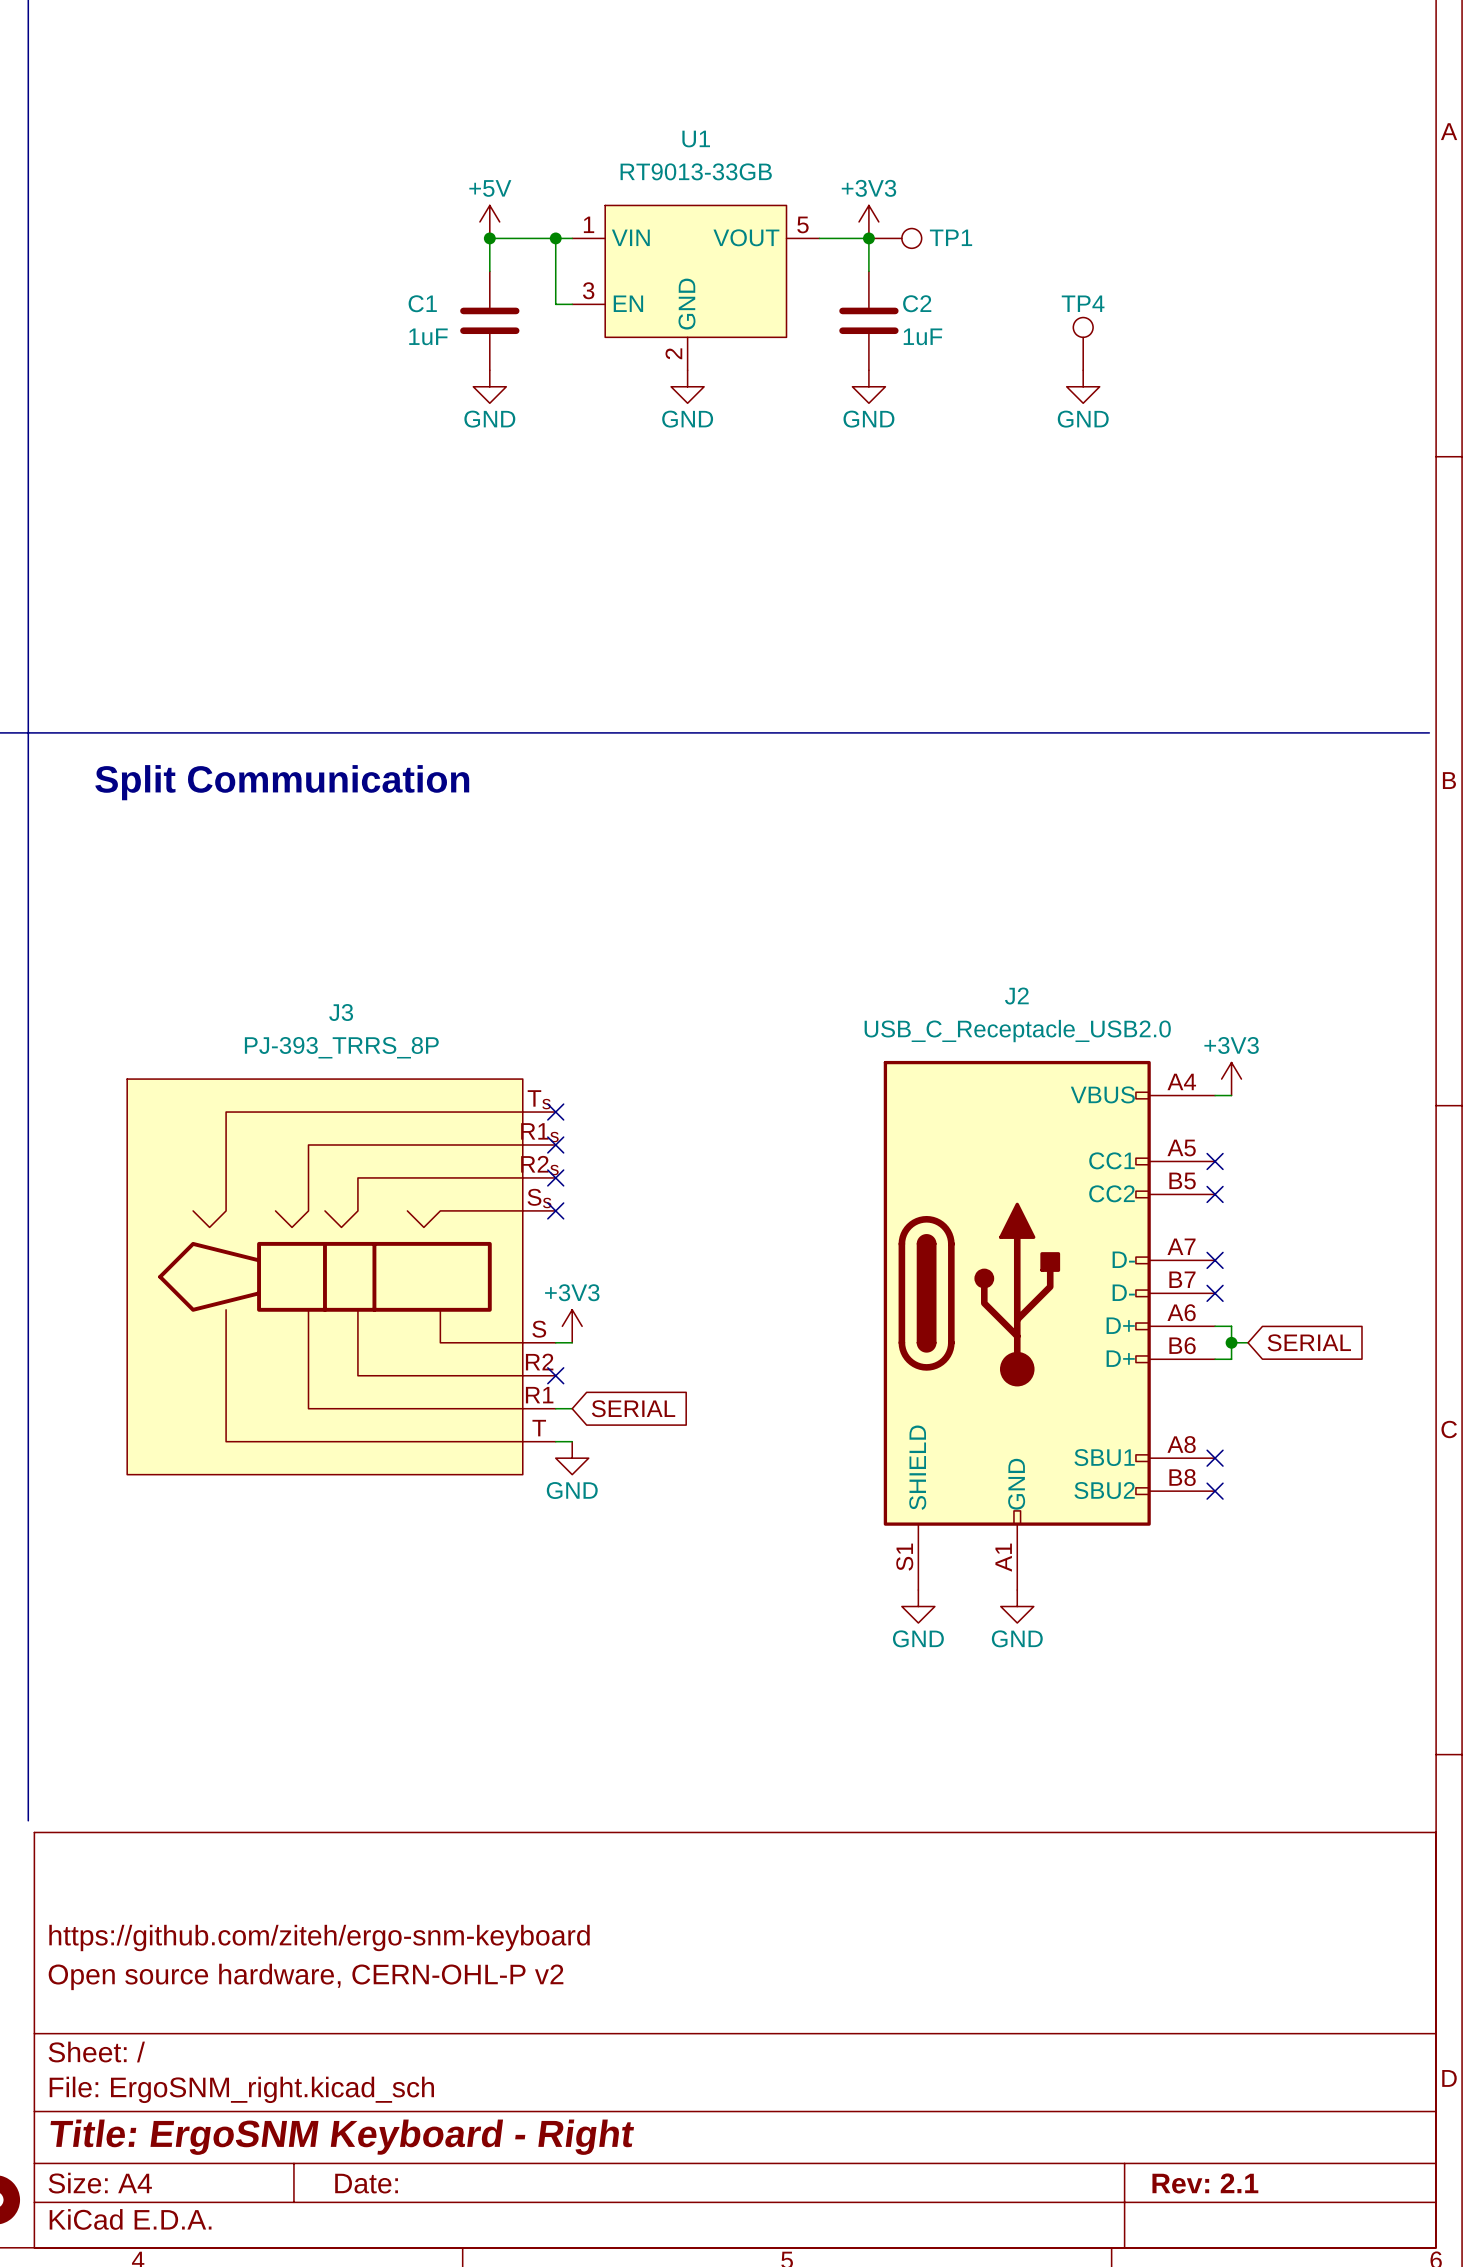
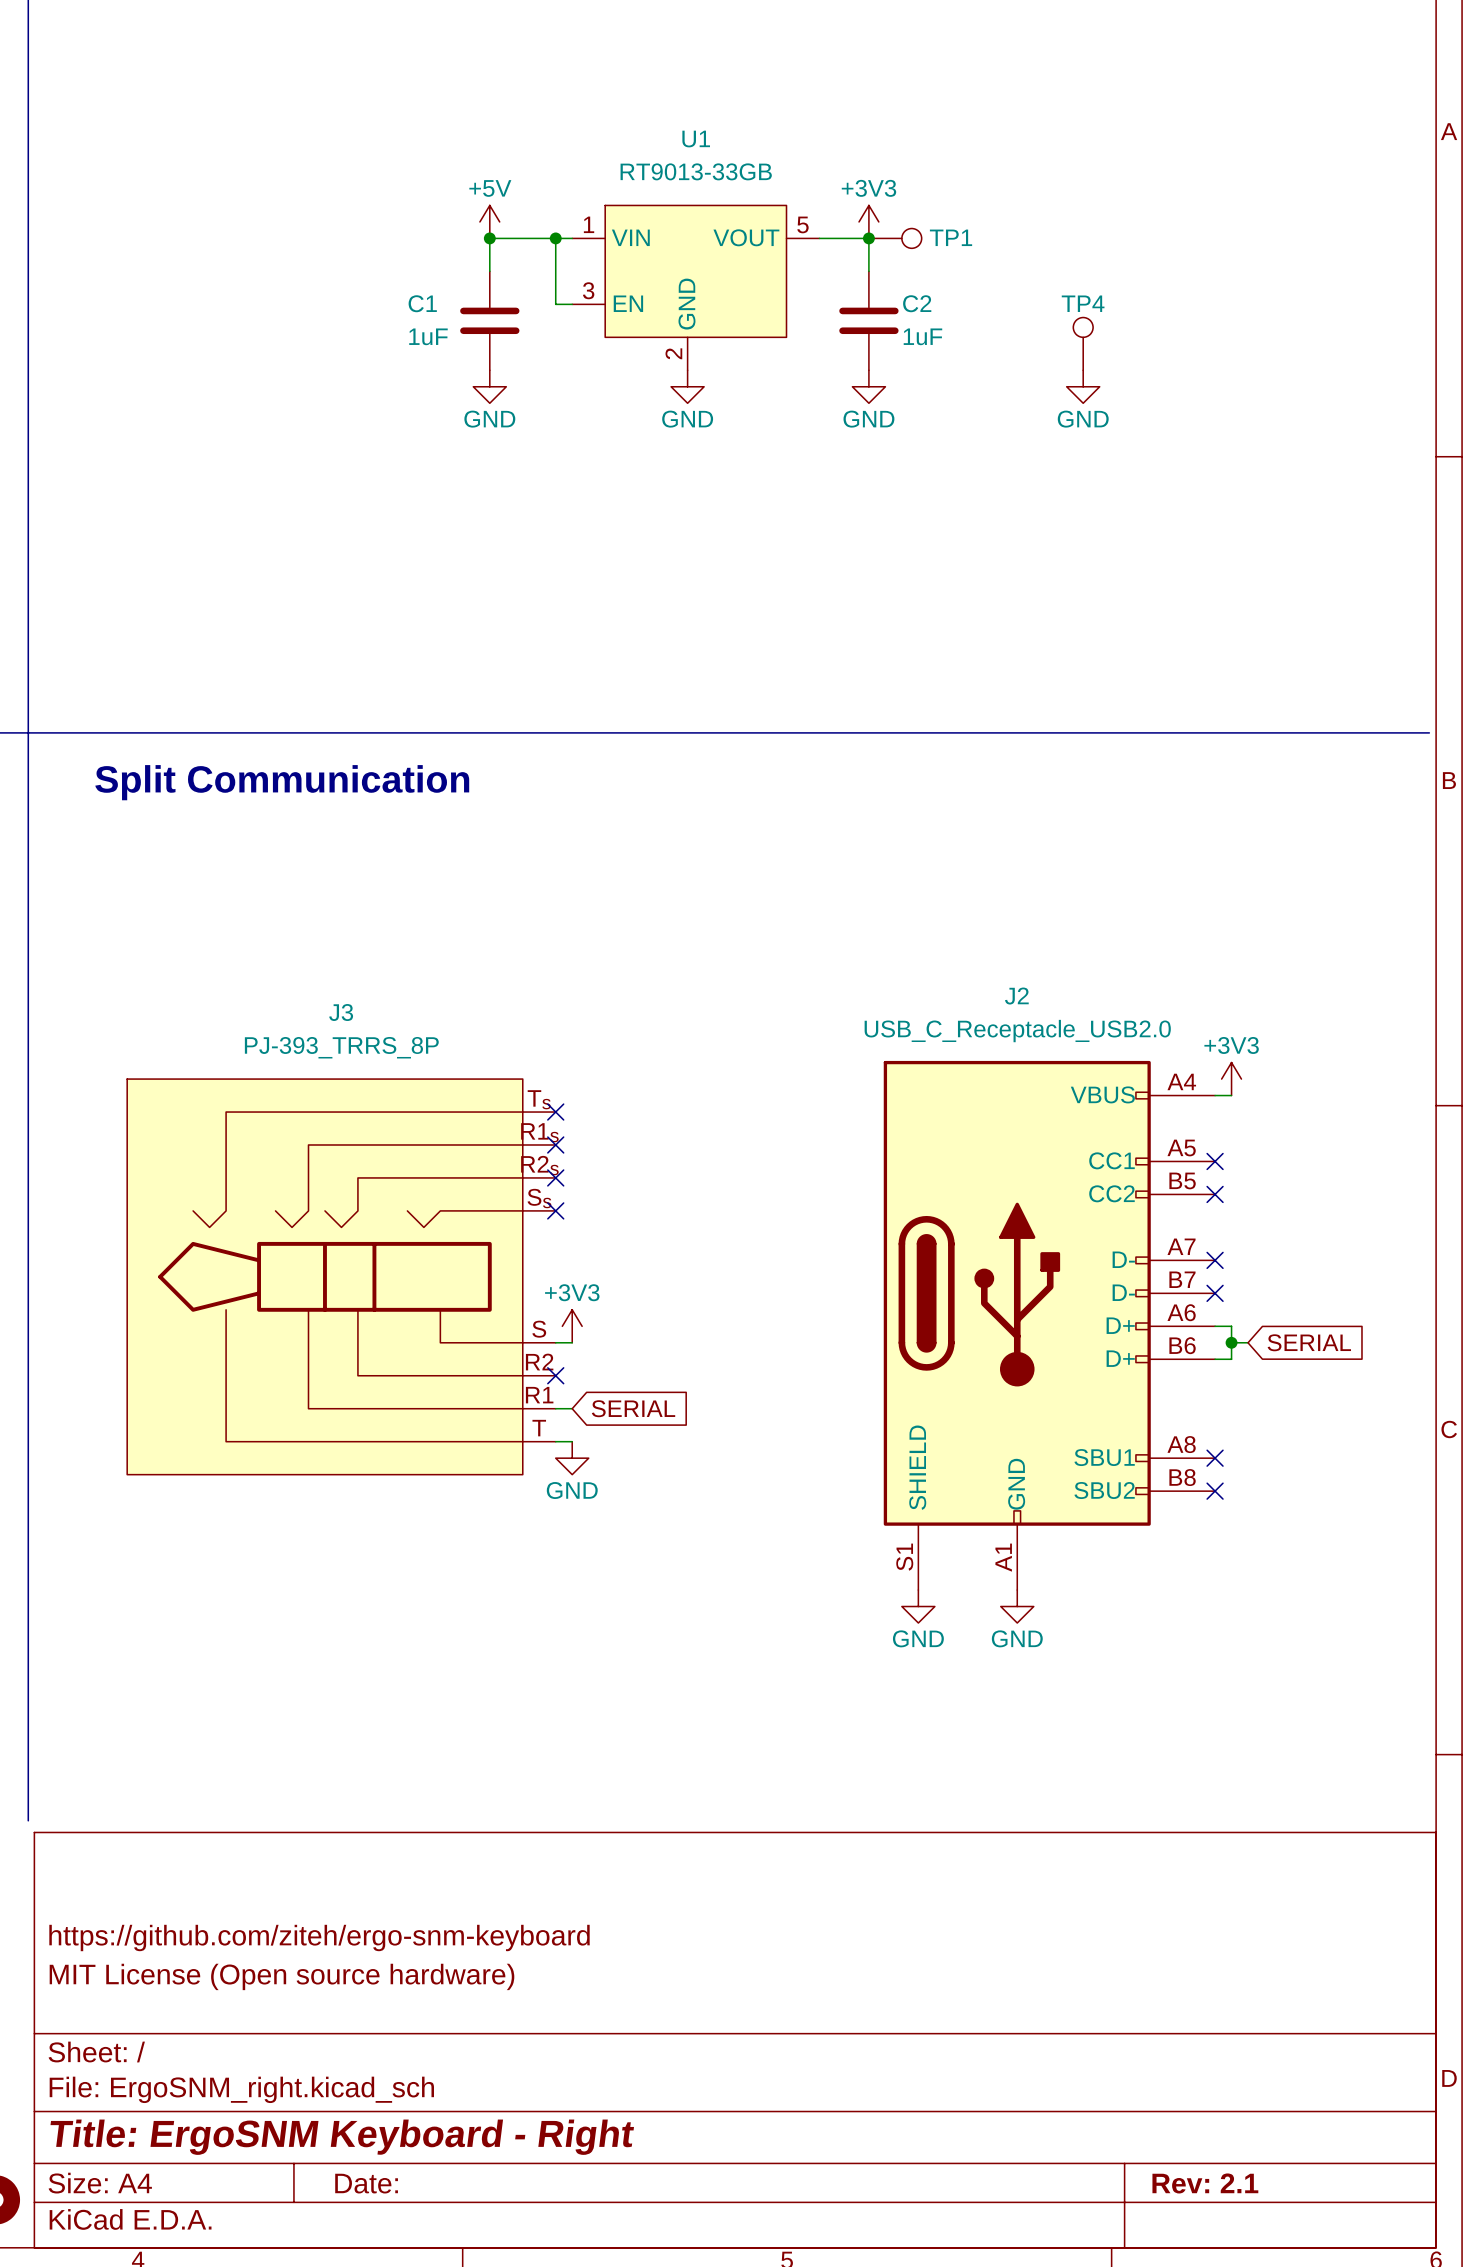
title block: Open source hardware, CERN-OHL-P v2 (306, 1976) -> MIT License (Open source hardware) (281, 1976)

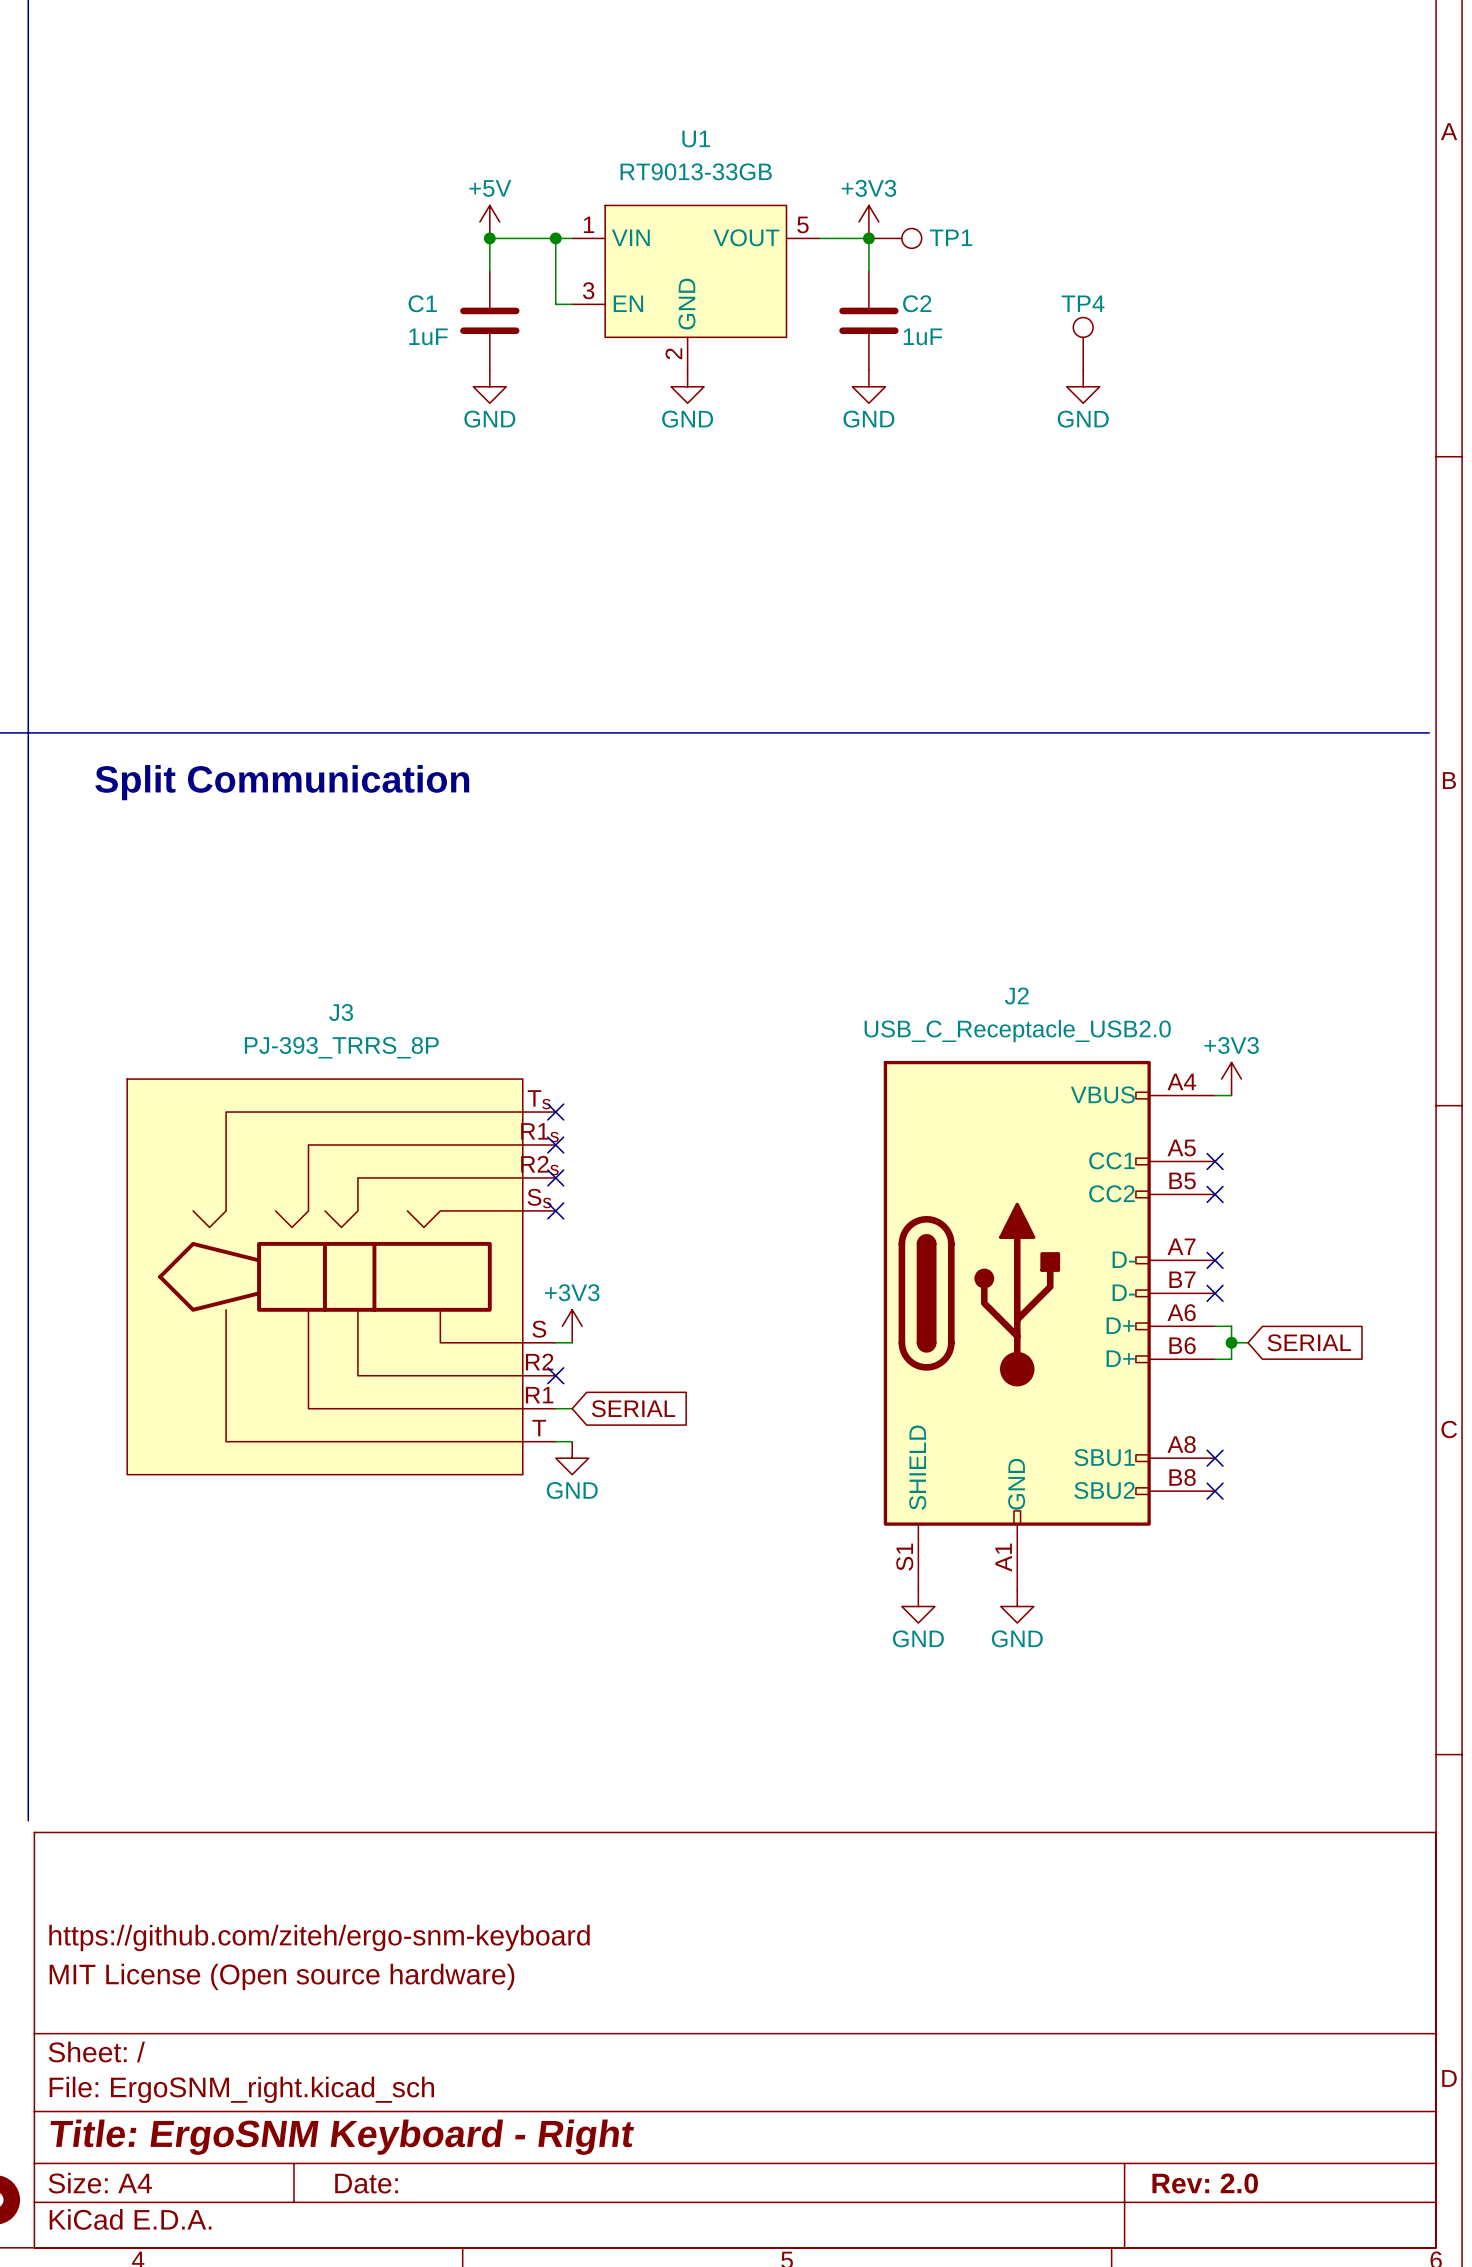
title block: Rev: 2.1 (1205, 2183) -> Rev: 2.0 (1205, 2183)

